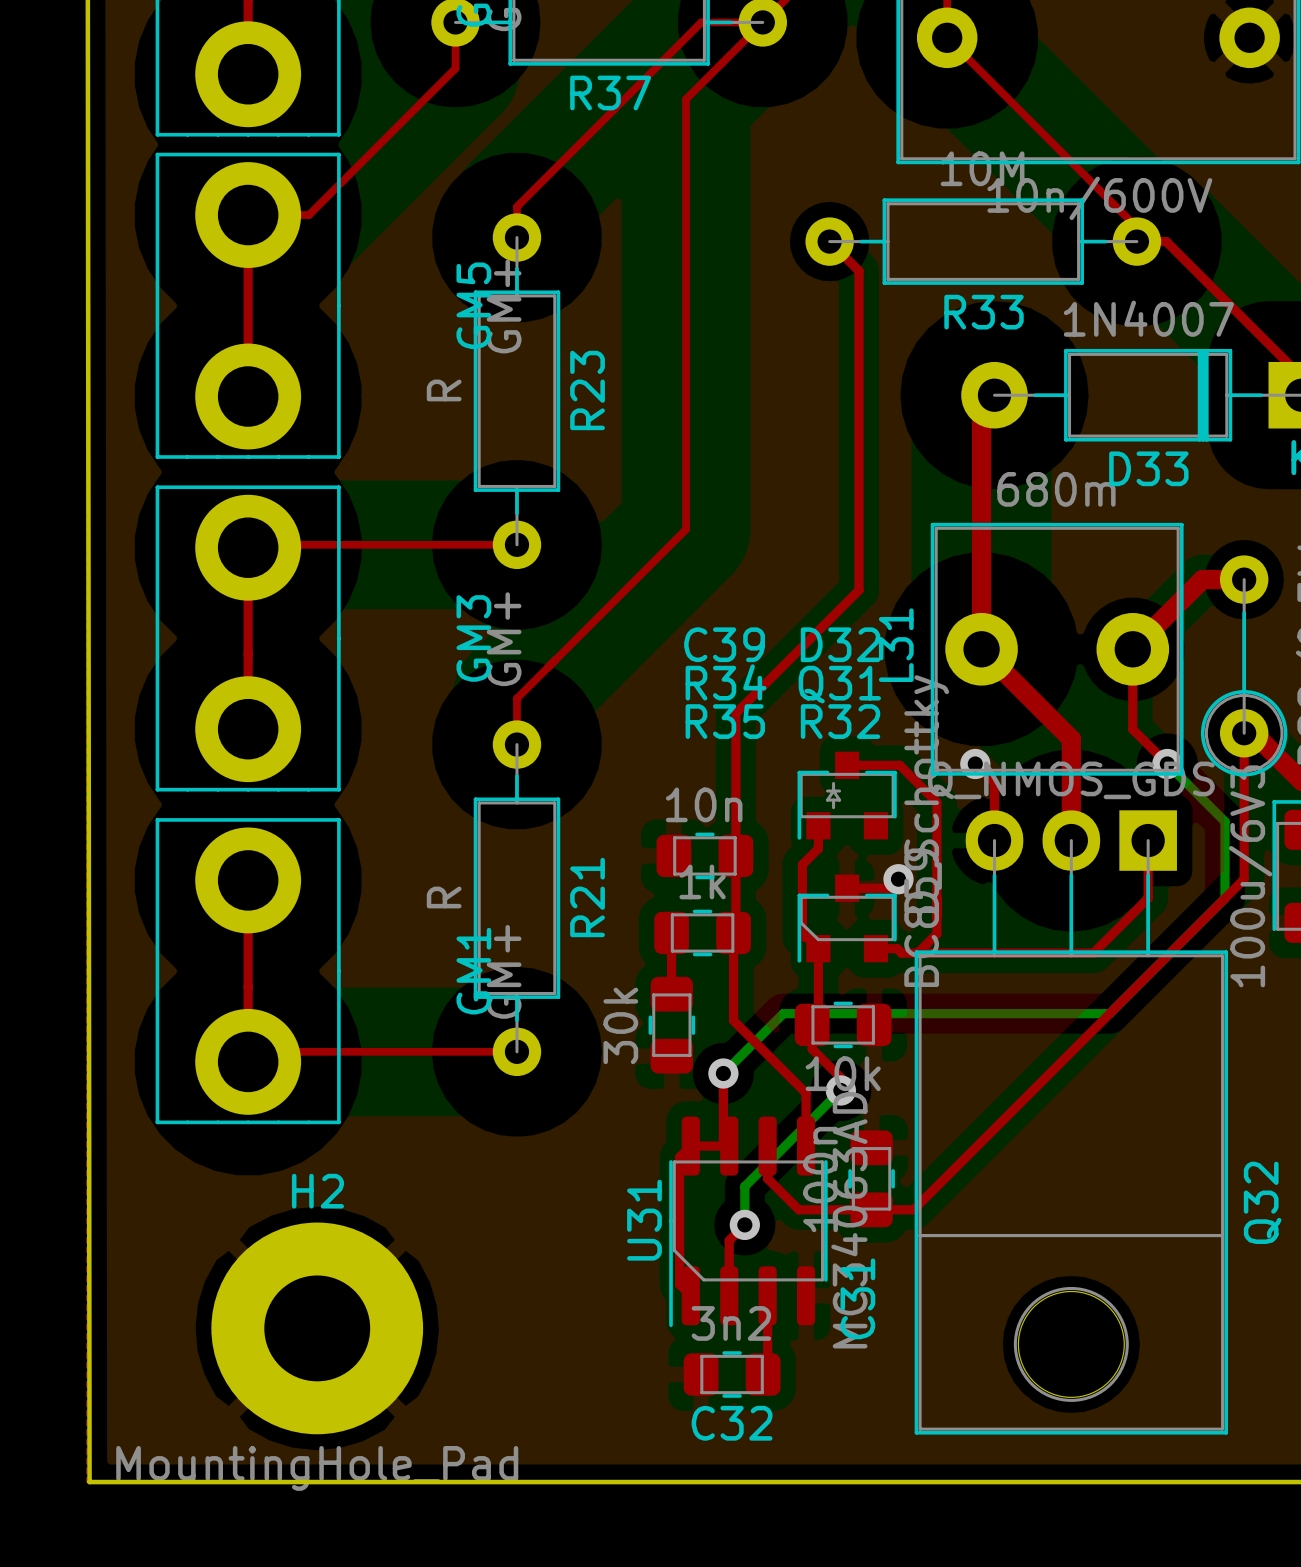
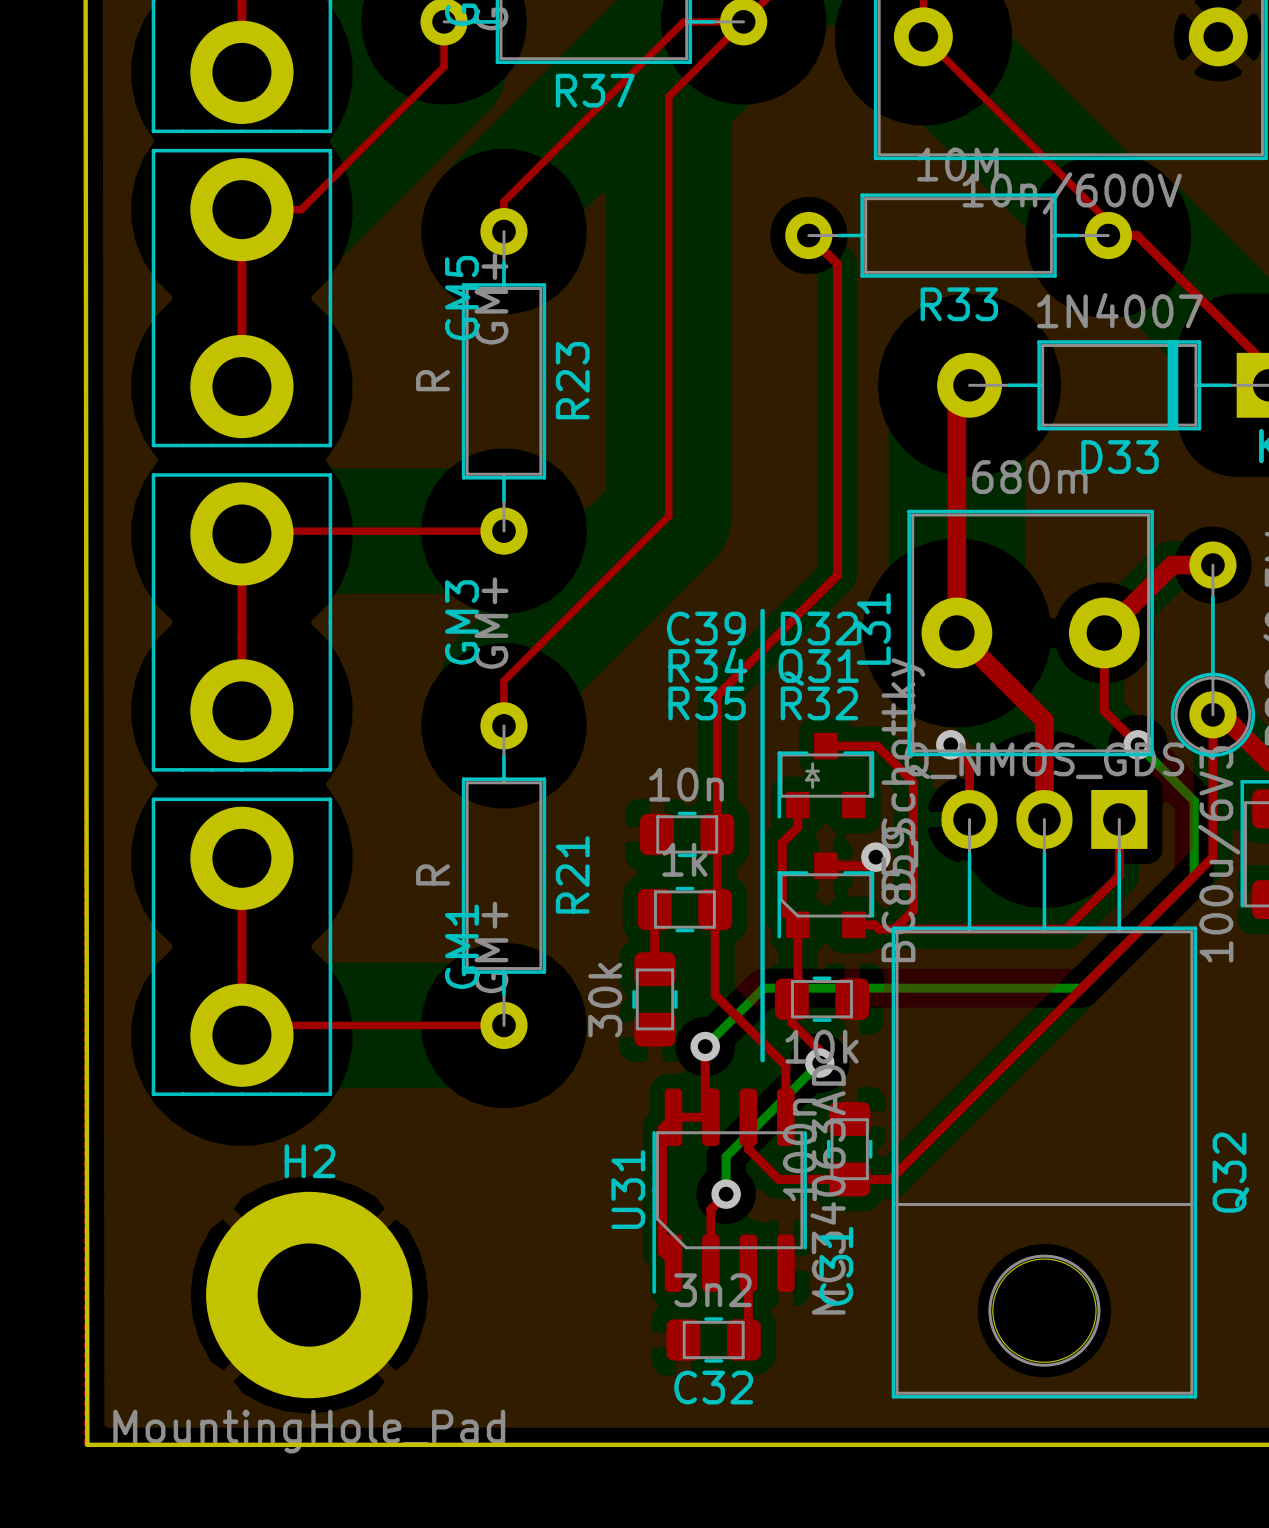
line: none -> (762, 610) (762, 1060)

